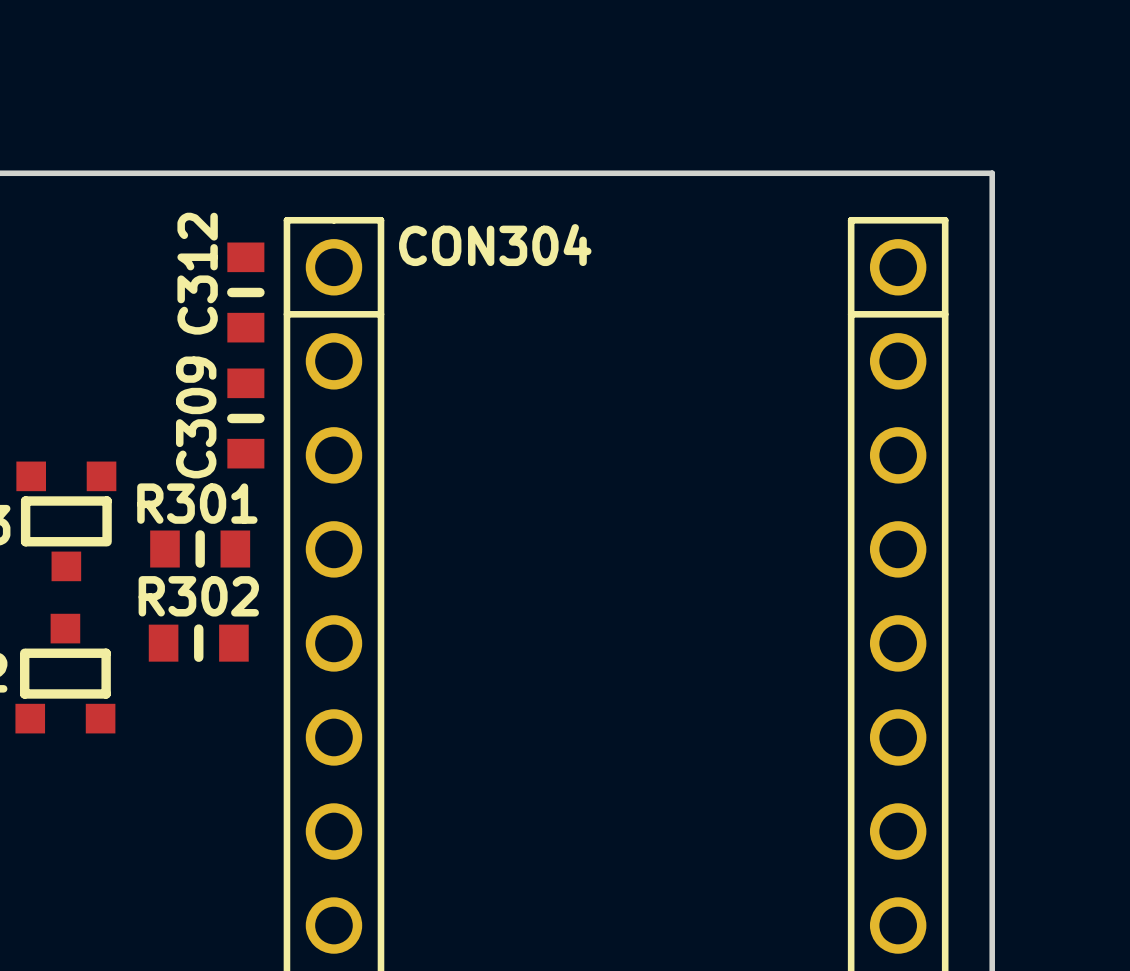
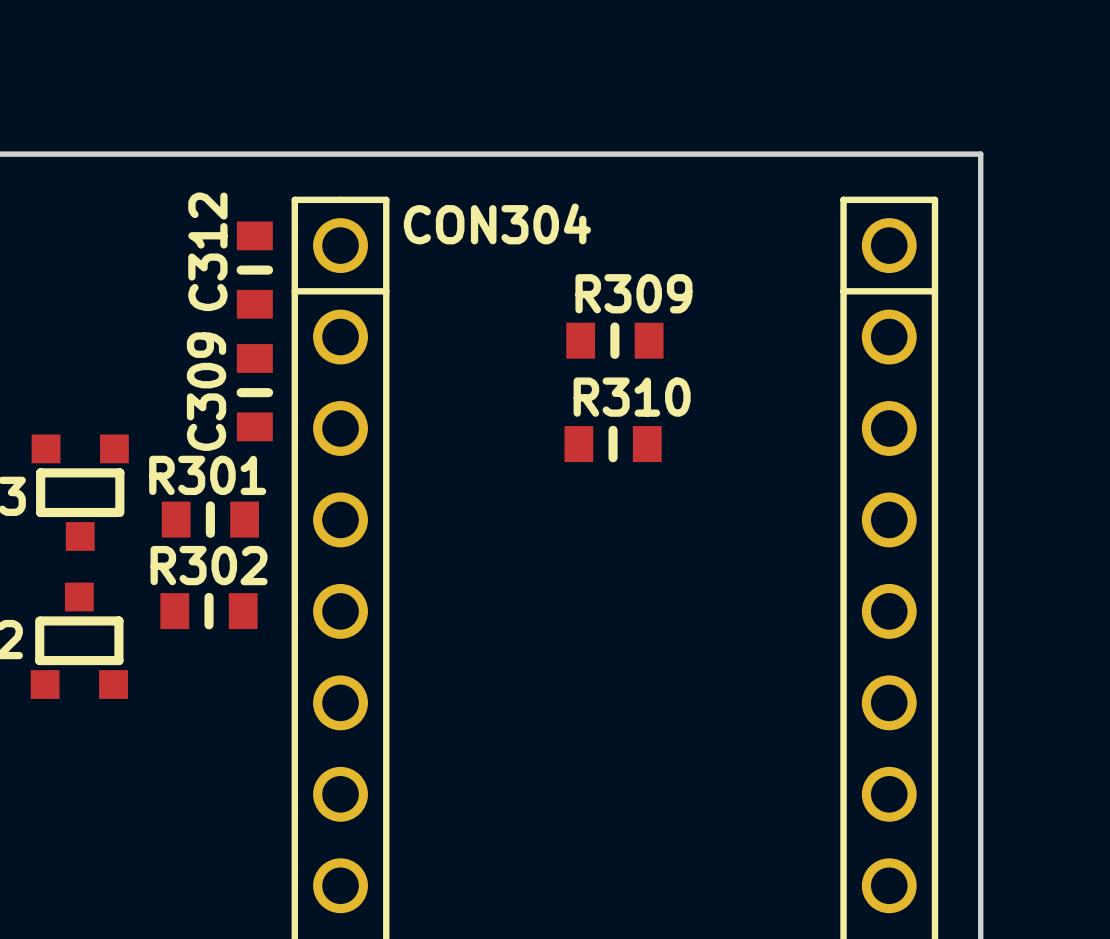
R309: none -> (614, 340)
R310: none -> (613, 444)

